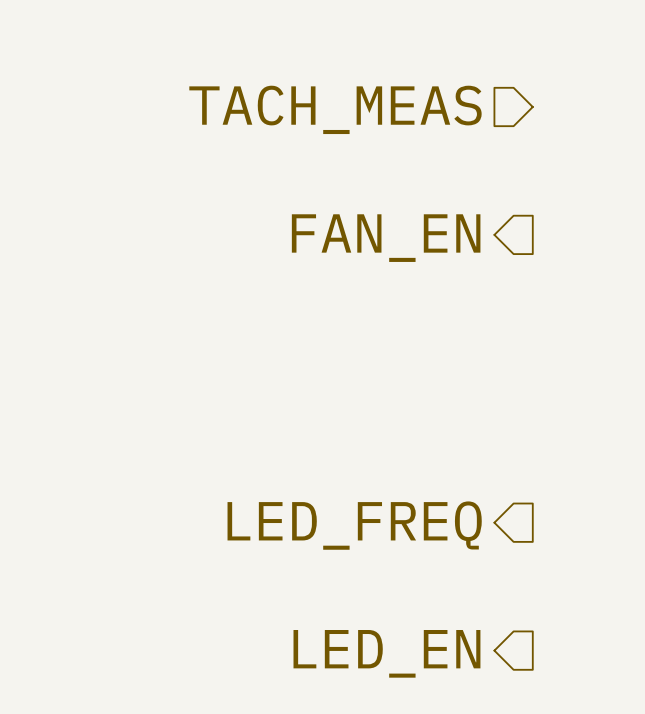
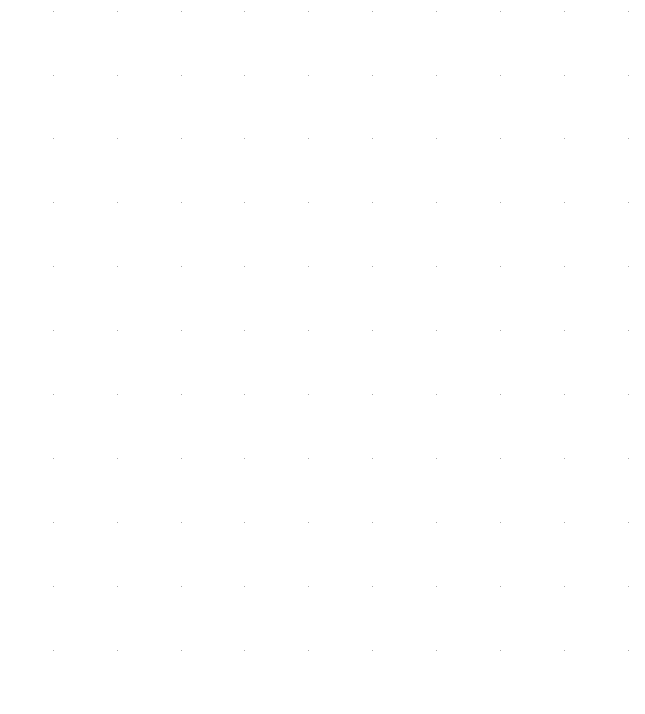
hierarchical label: TACH_MEAS (335, 109) -> none
hierarchical label: FAN_EN (386, 238) -> none
hierarchical label: LED_FREQ (354, 525) -> none
hierarchical label: LED_EN (386, 653) -> none

